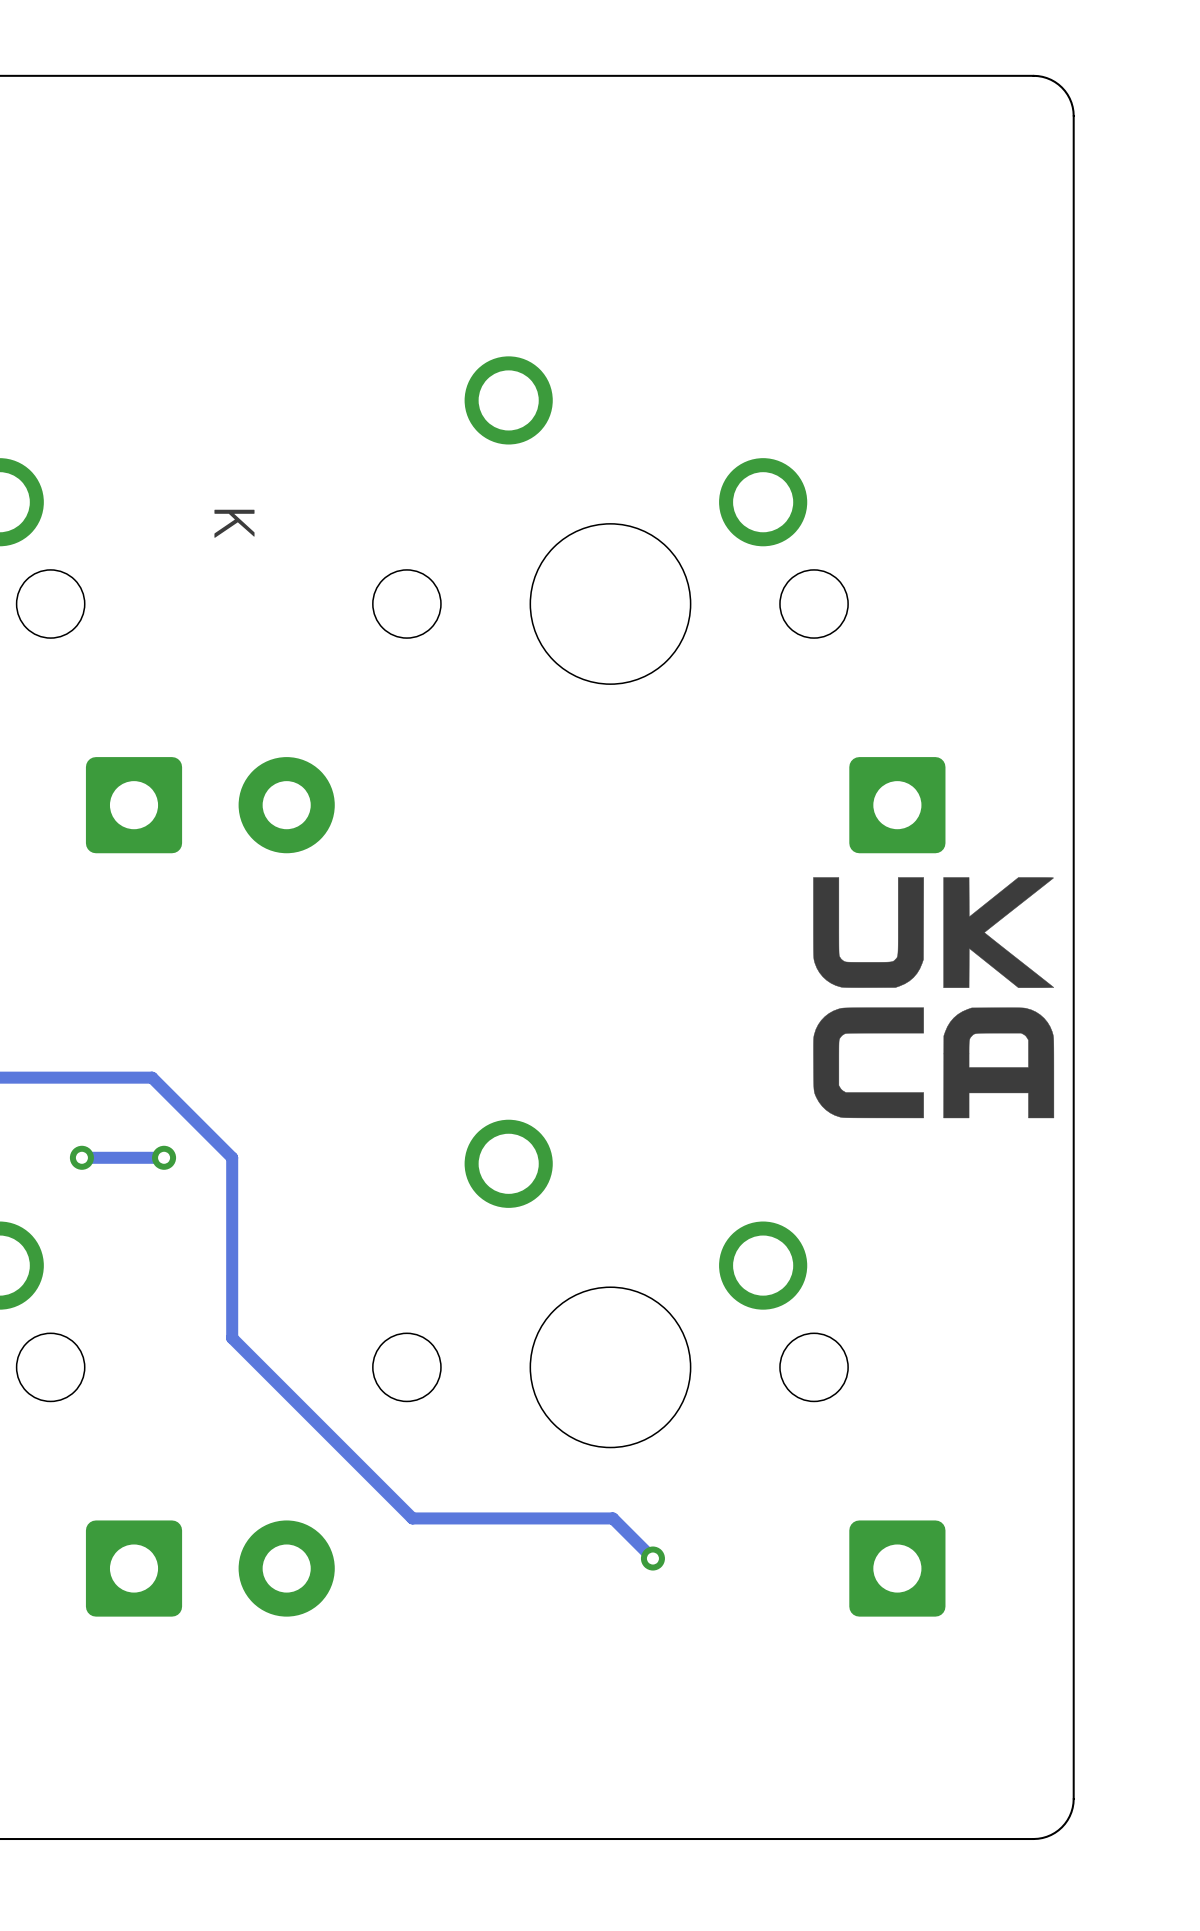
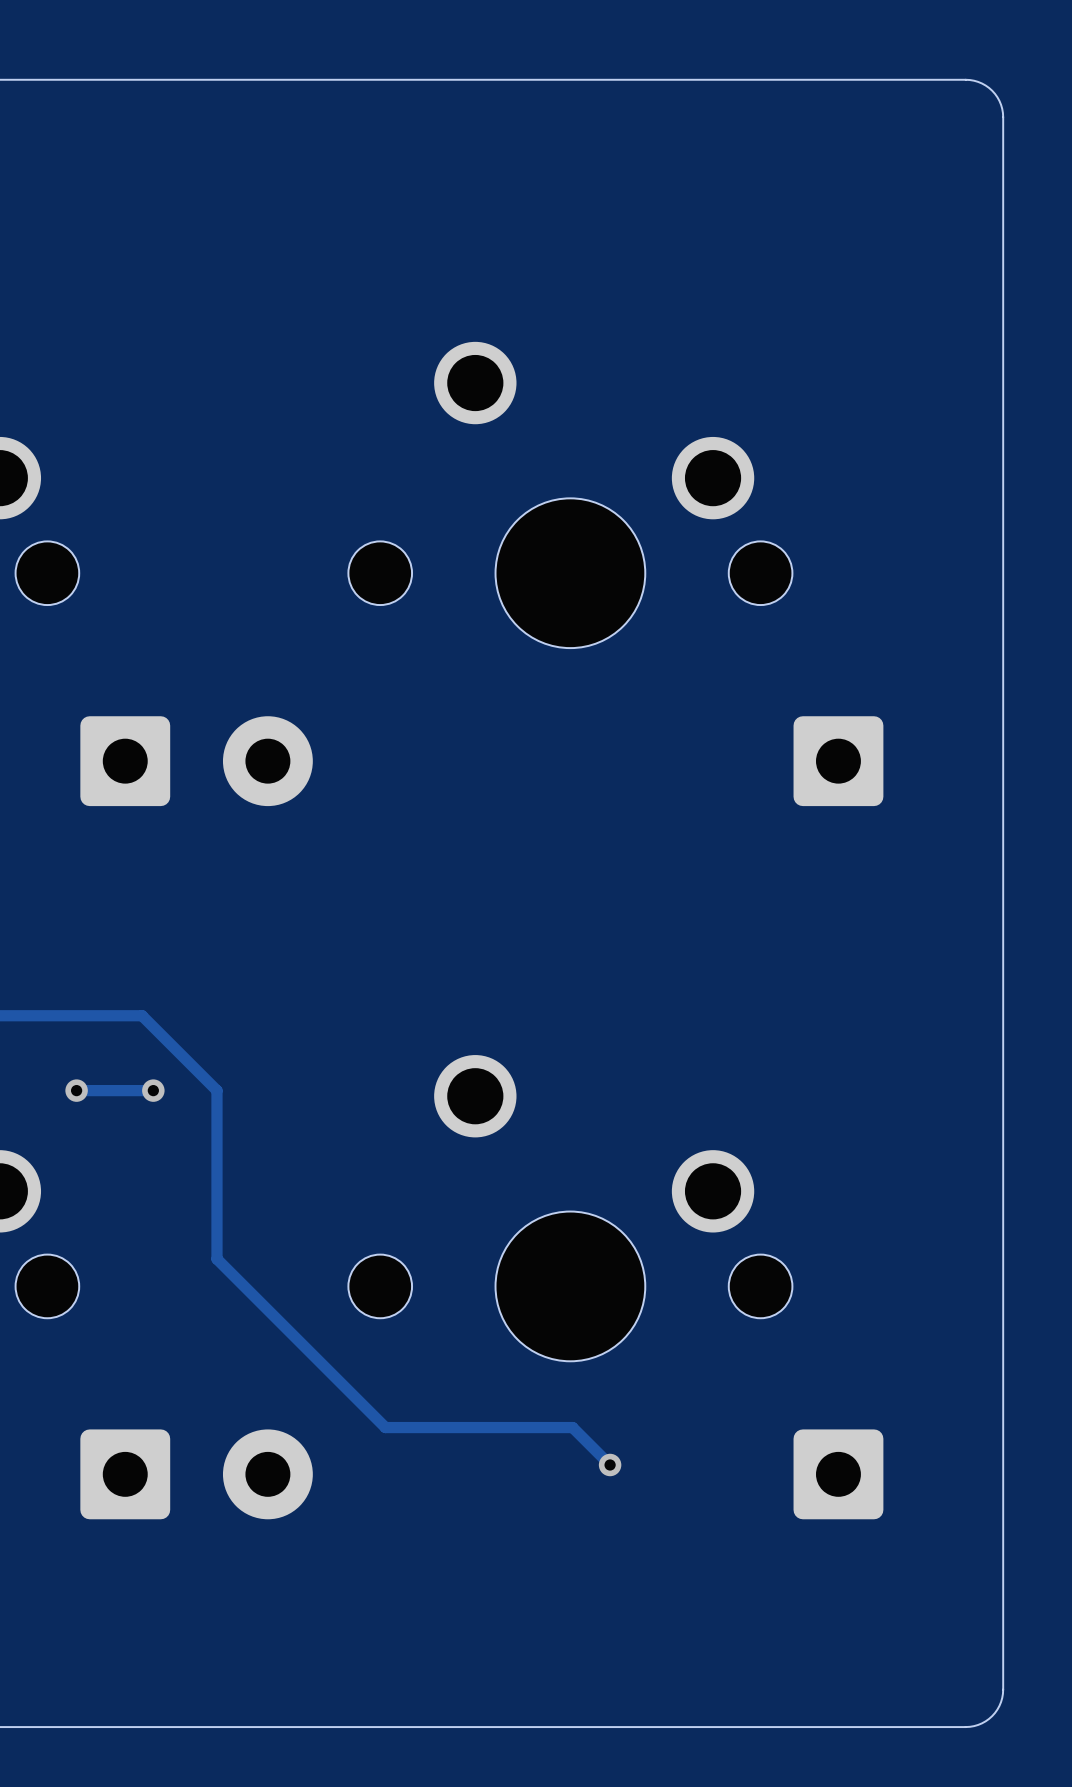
text: K (234, 523) -> none
drawing: [813, 877, 1055, 1119] -> none

